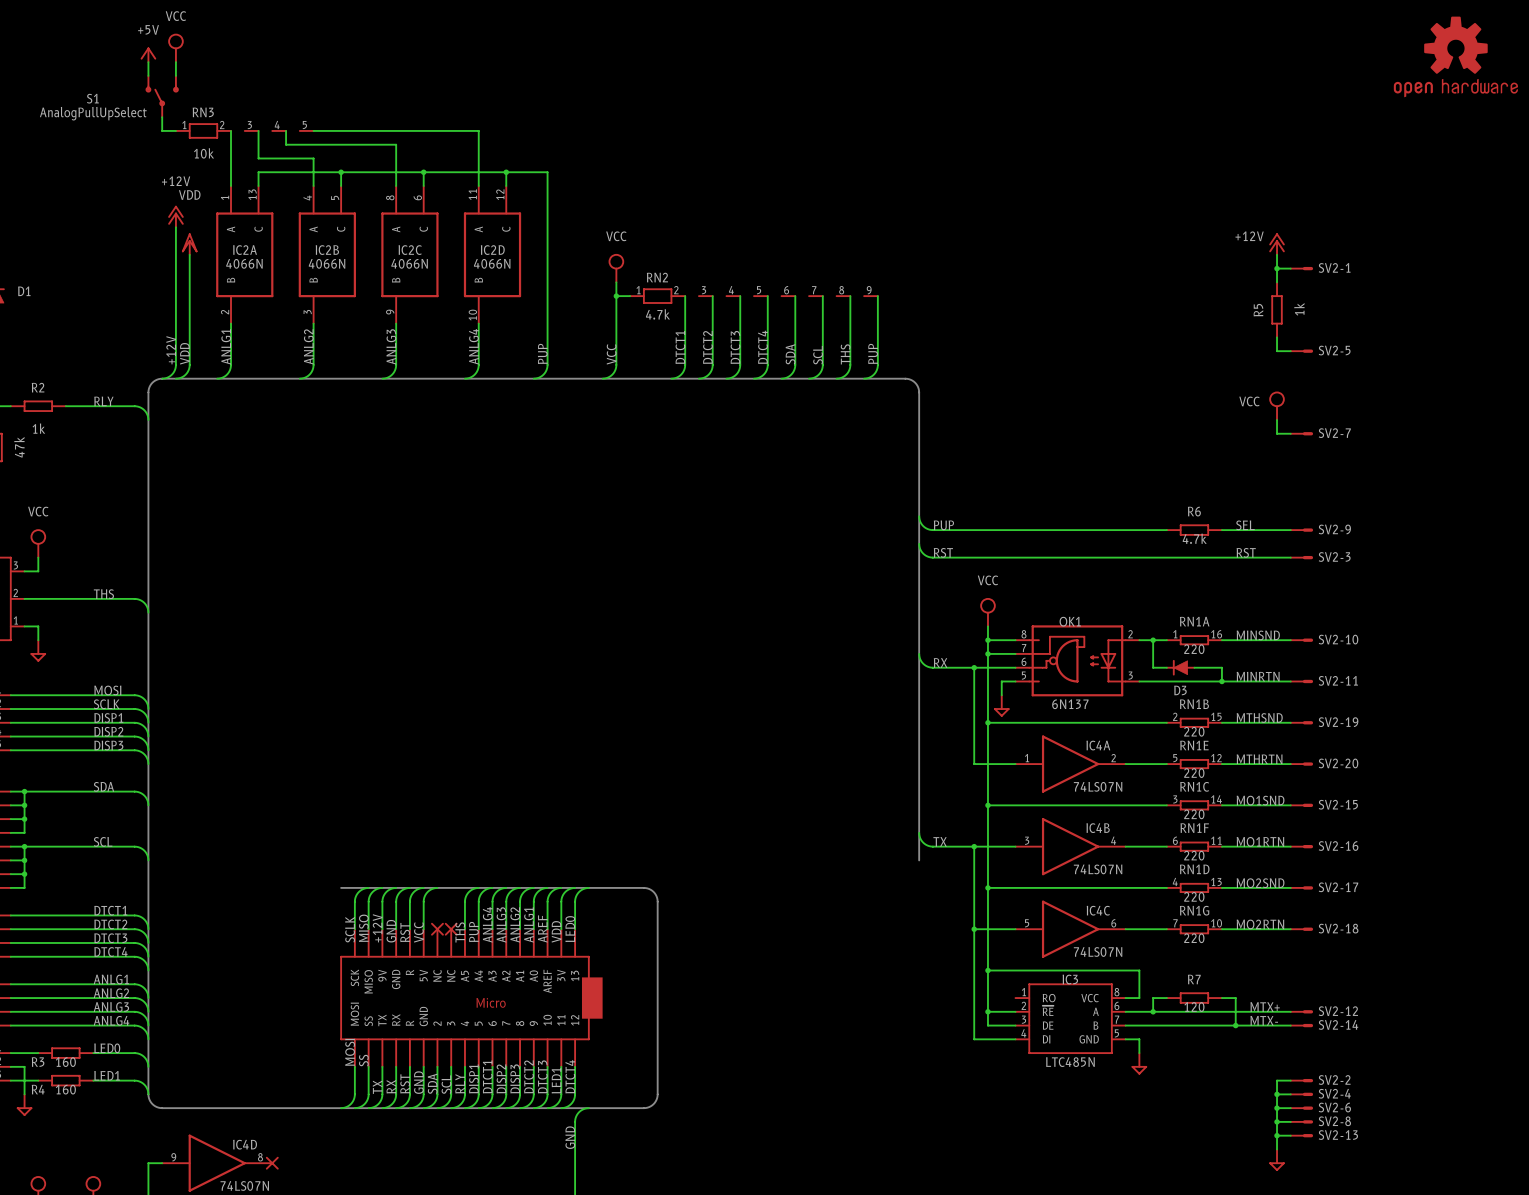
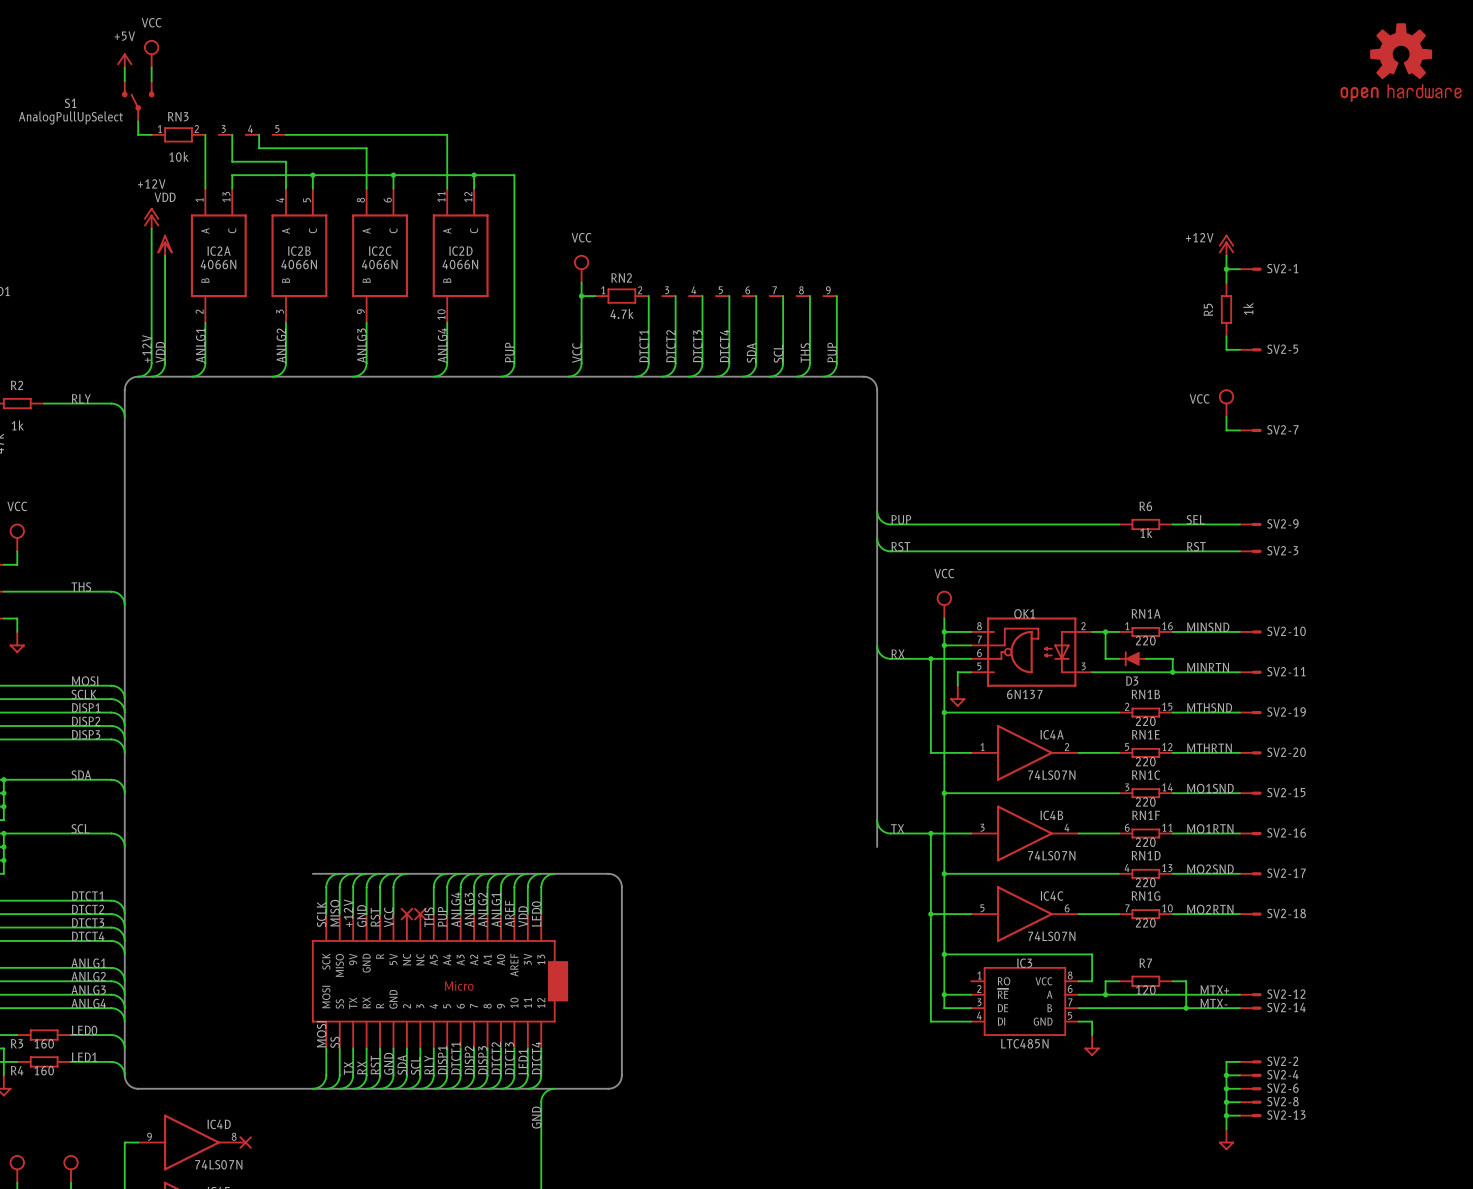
R6 value: 4.7k (1194, 538) -> 1k (1146, 532)

